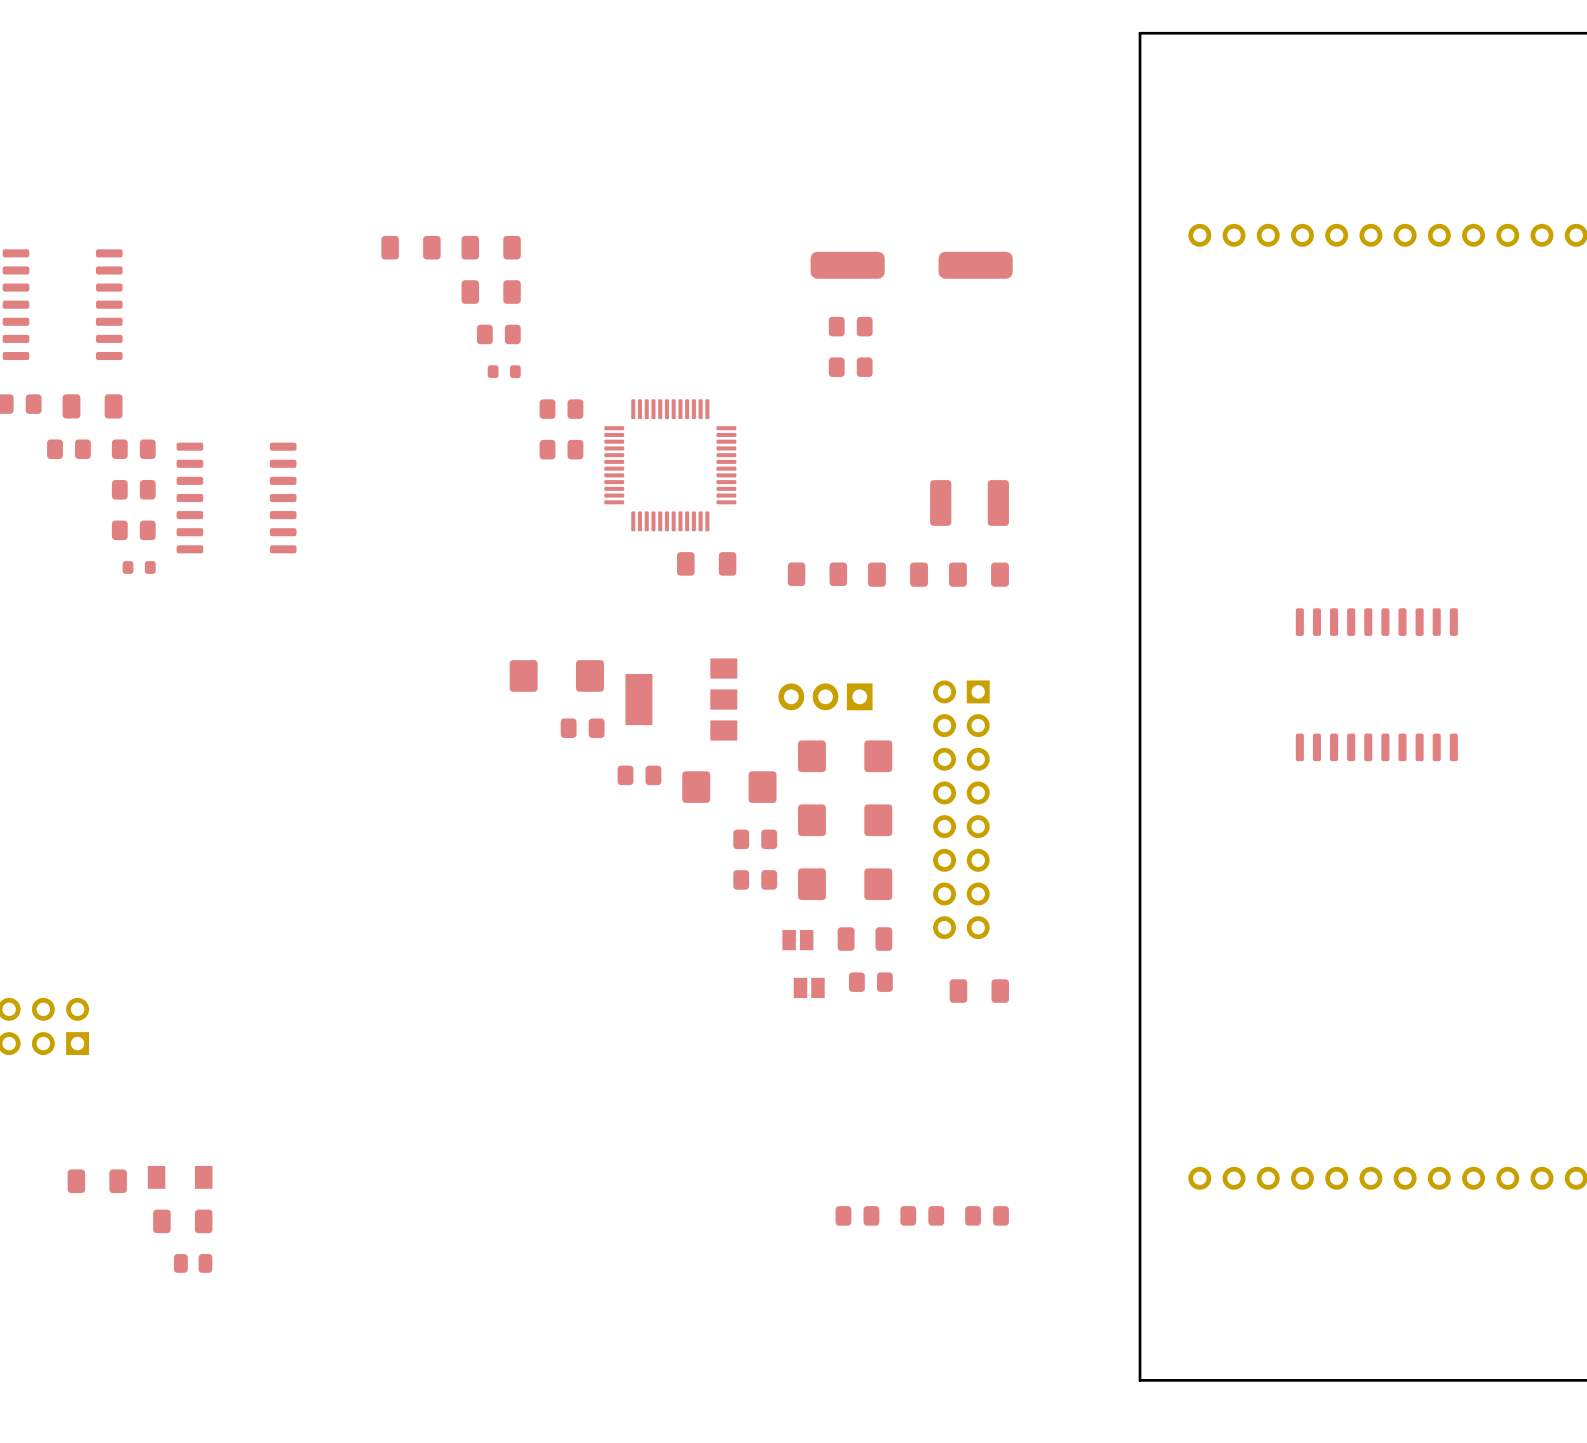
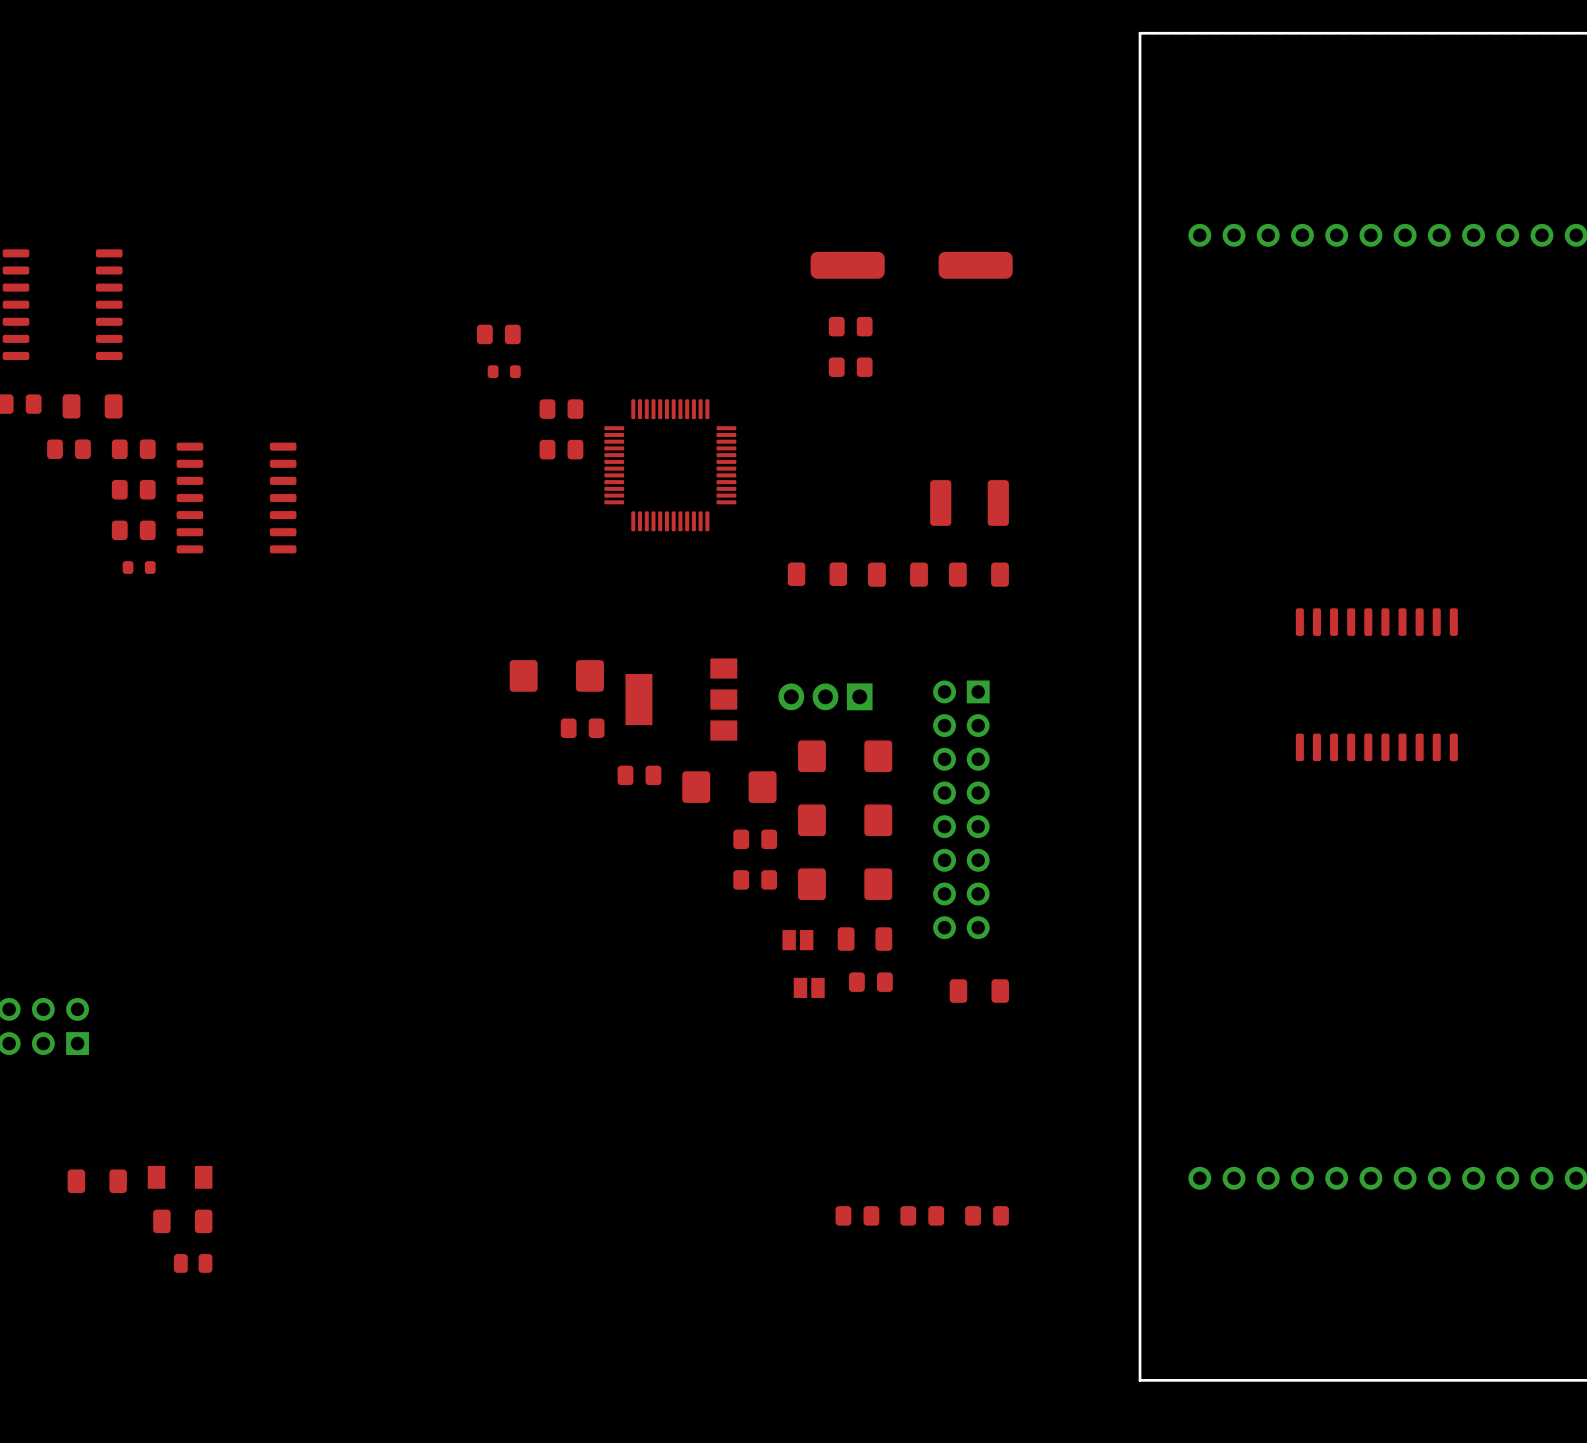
part: (411, 247) -> none
part: (491, 247) -> none
part: (491, 292) -> none
part: (706, 563) -> none

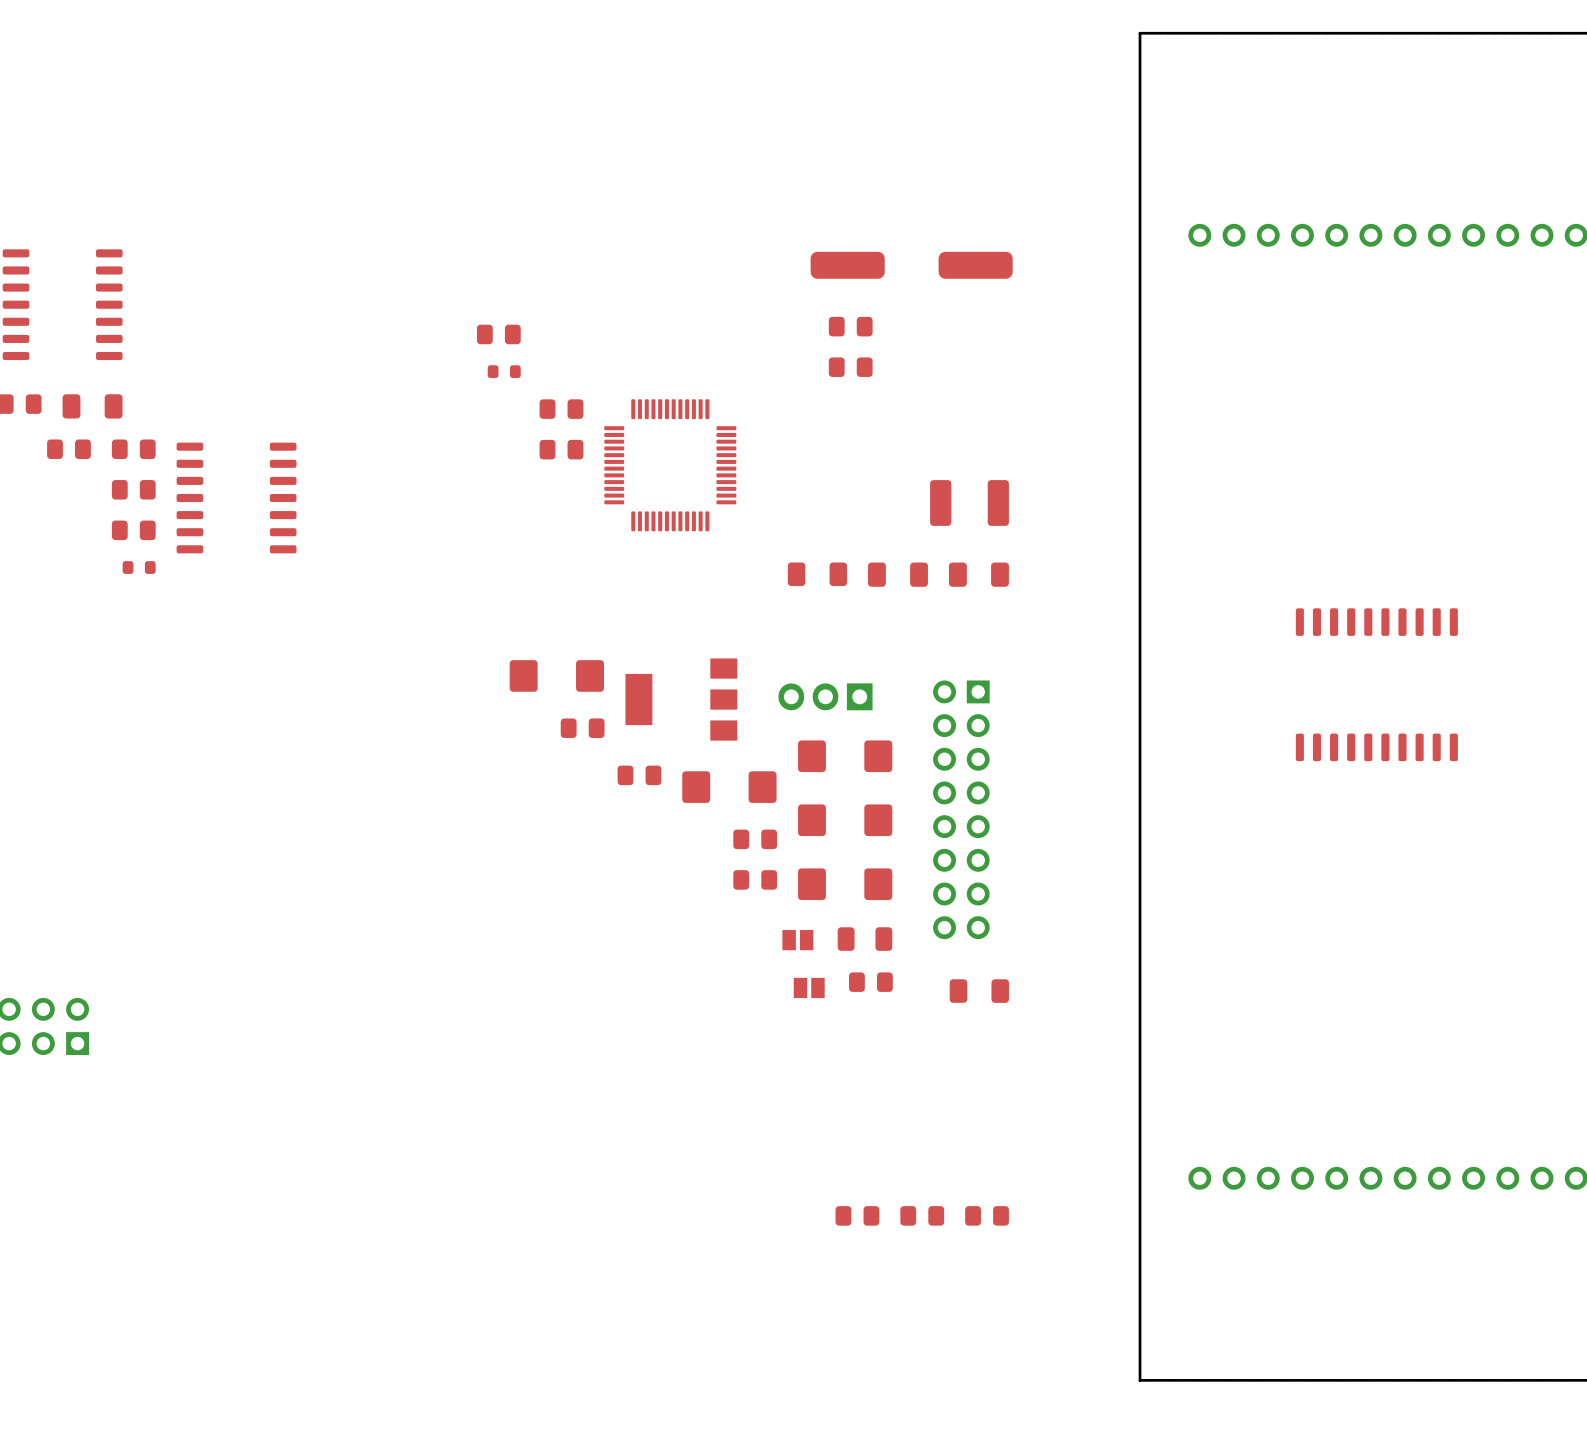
part: (180, 1177) -> none
part: (97, 1181) -> none
part: (182, 1221) -> none
part: (193, 1263) -> none

